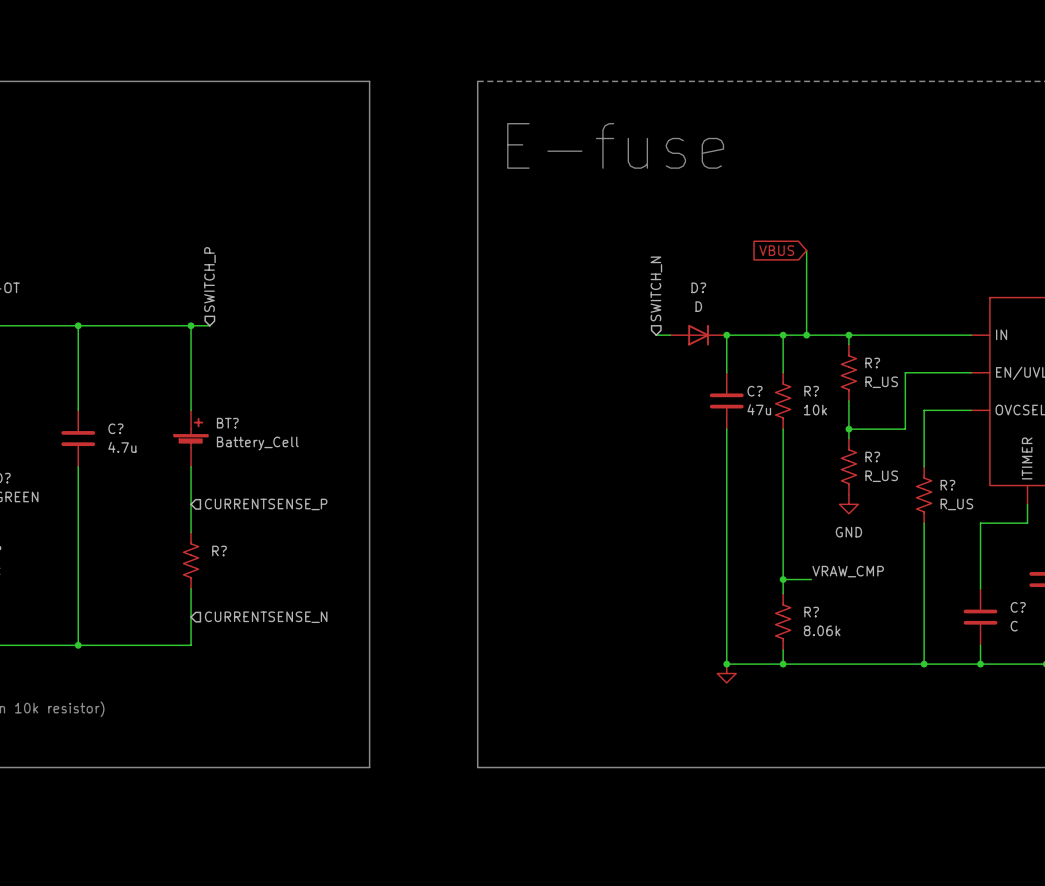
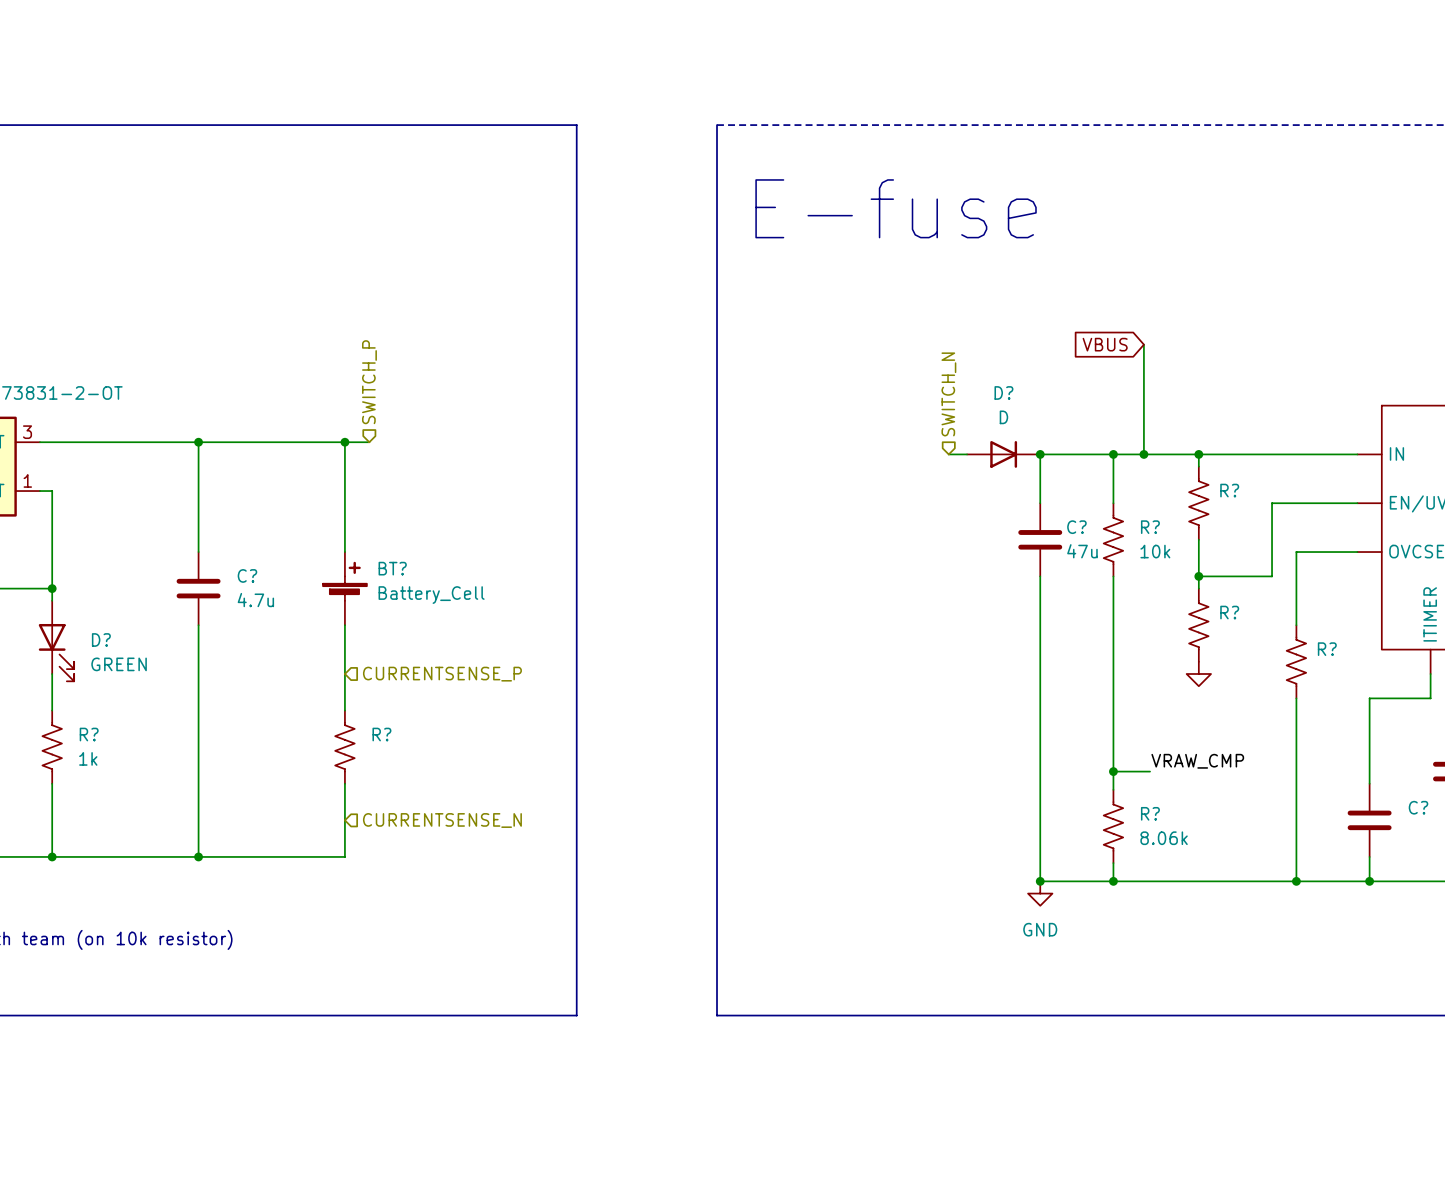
R? value: R_US (881, 382) -> none
R? value: R_US (881, 476) -> none
R? value: R_US (956, 504) -> none
power symbol text: GND (848, 532) -> none
C? value: C (1014, 626) -> none
power symbol text: none -> GND (1040, 929)

